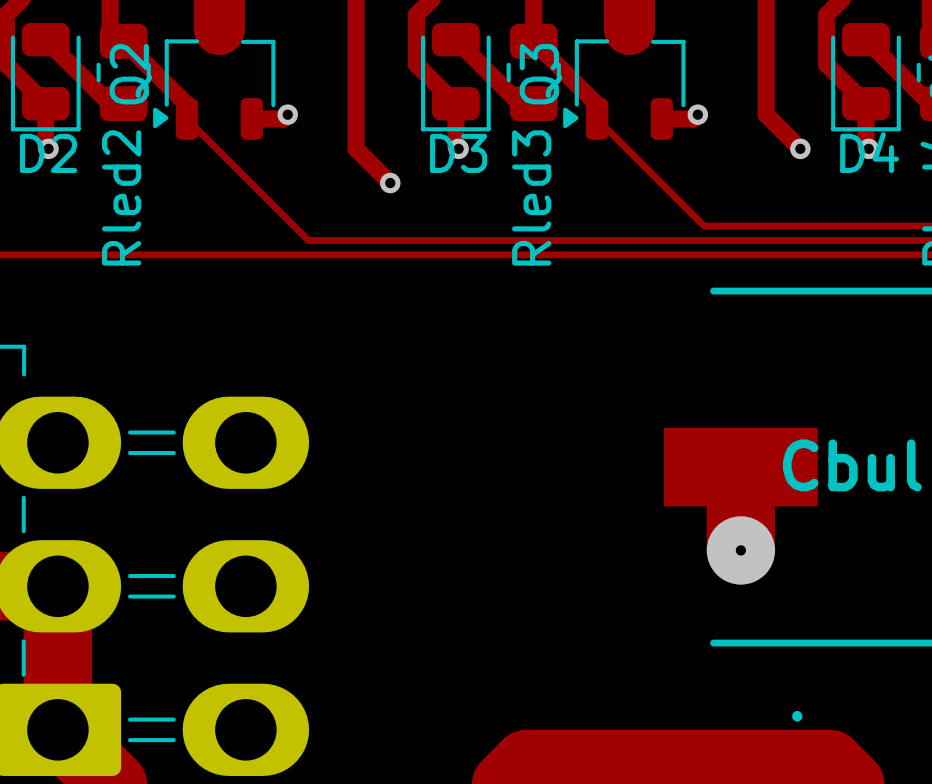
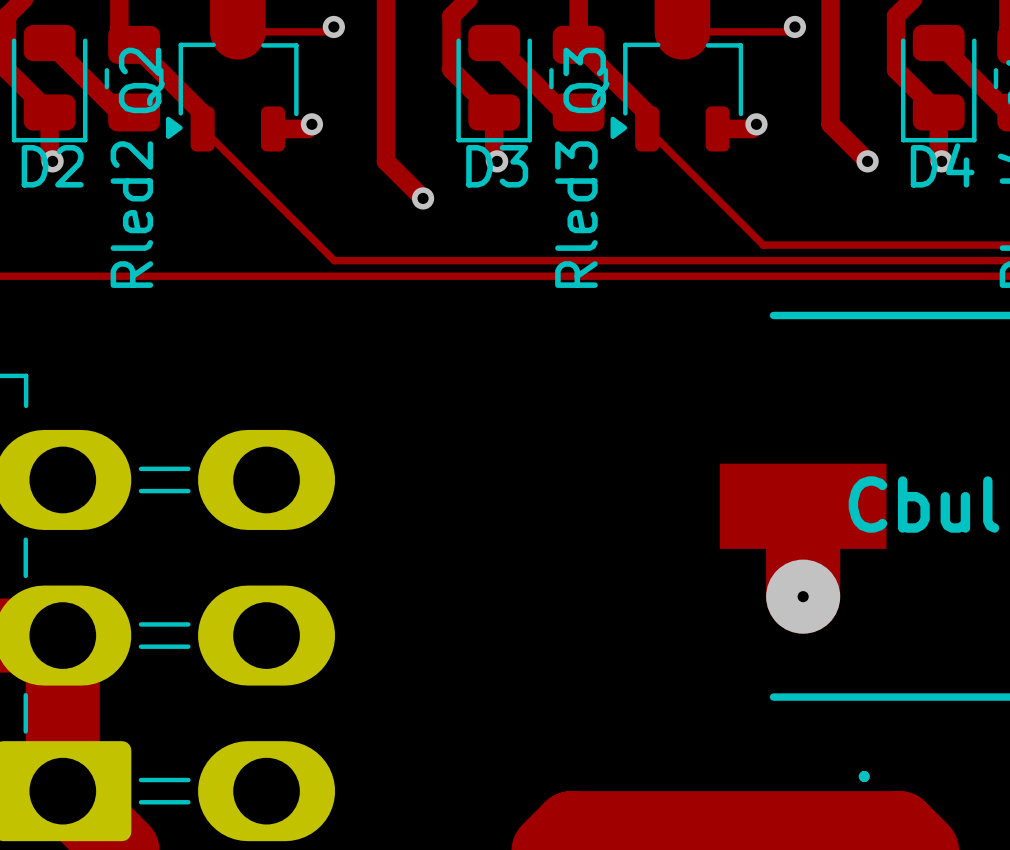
track: none -> (333, 26) (328, 31) (237, 31)
via: none -> (333, 26)
track: none -> (794, 26) (789, 31) (682, 31)
via: none -> (794, 26)

